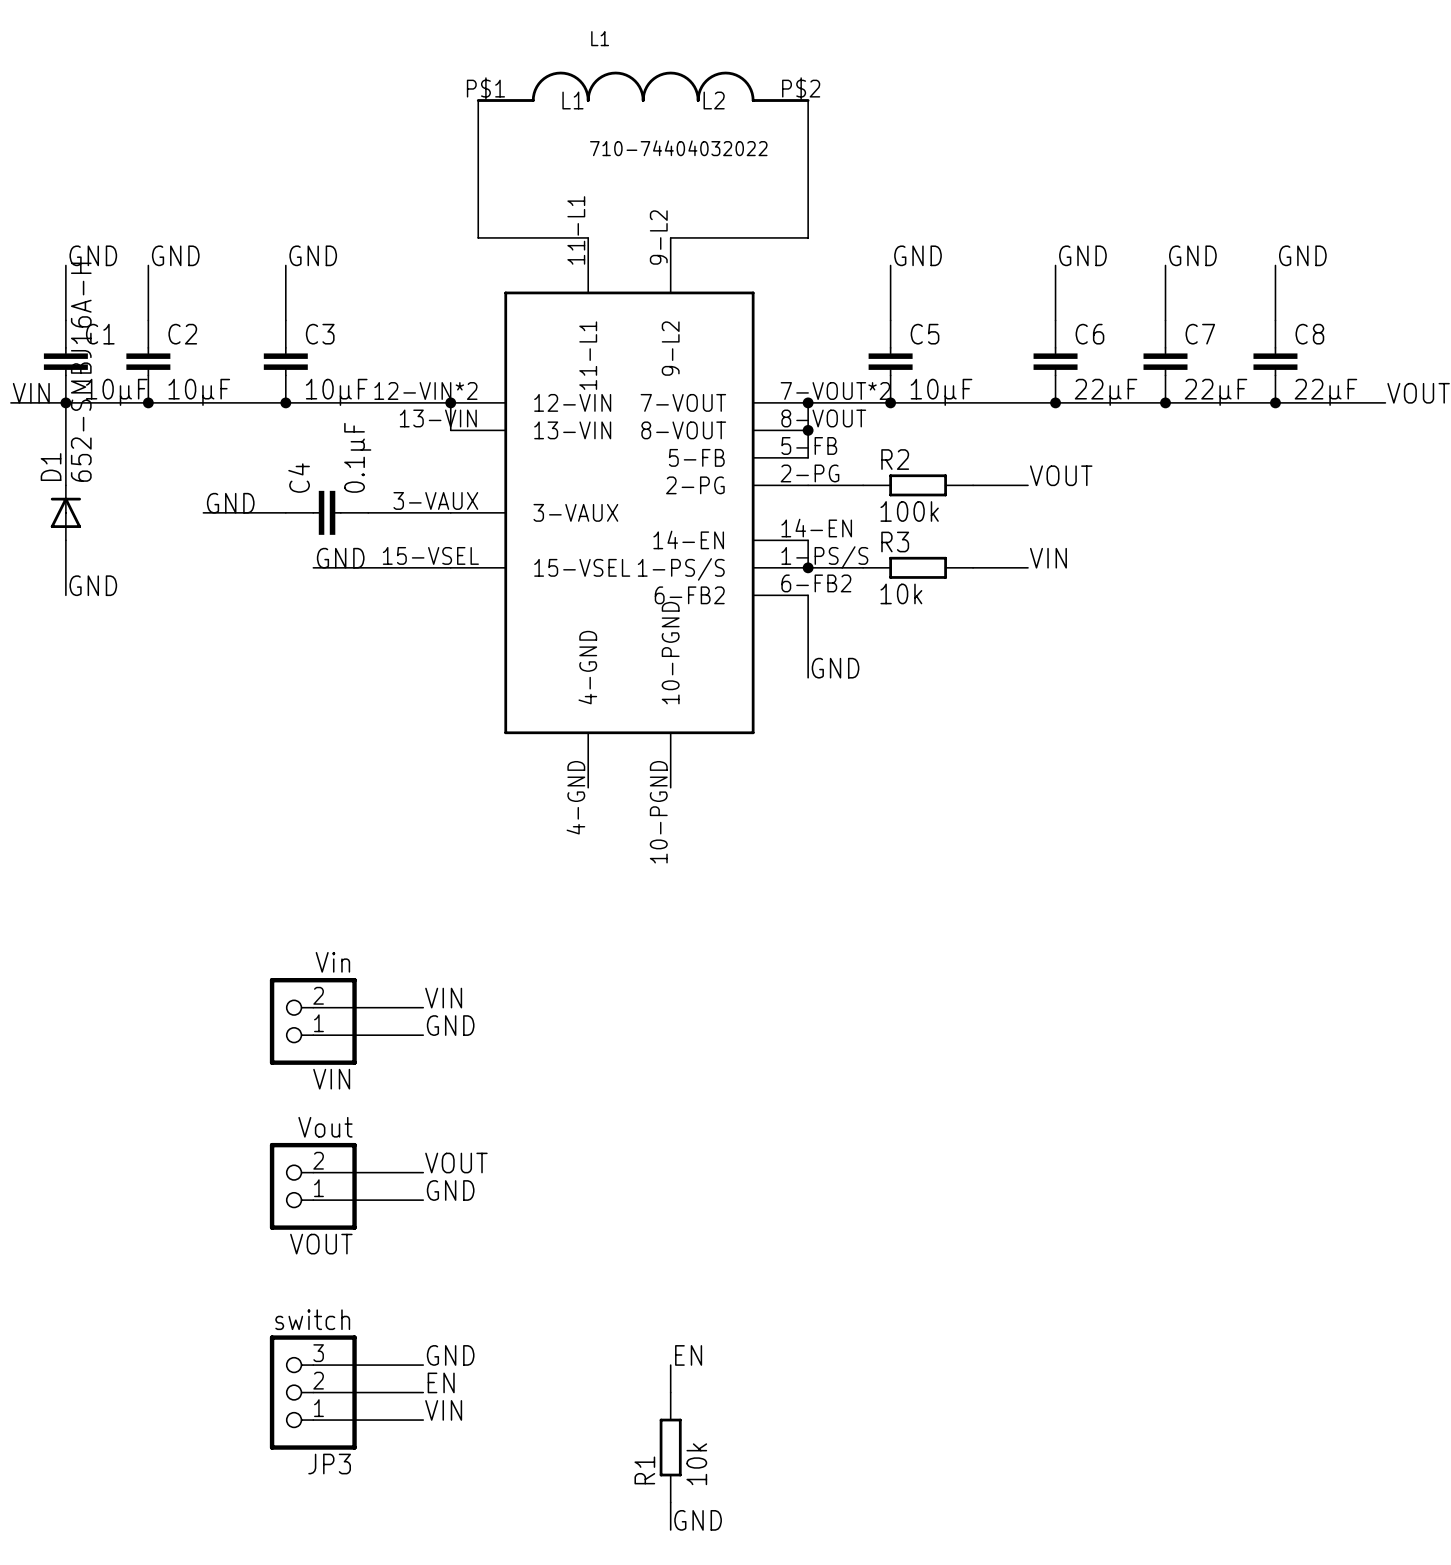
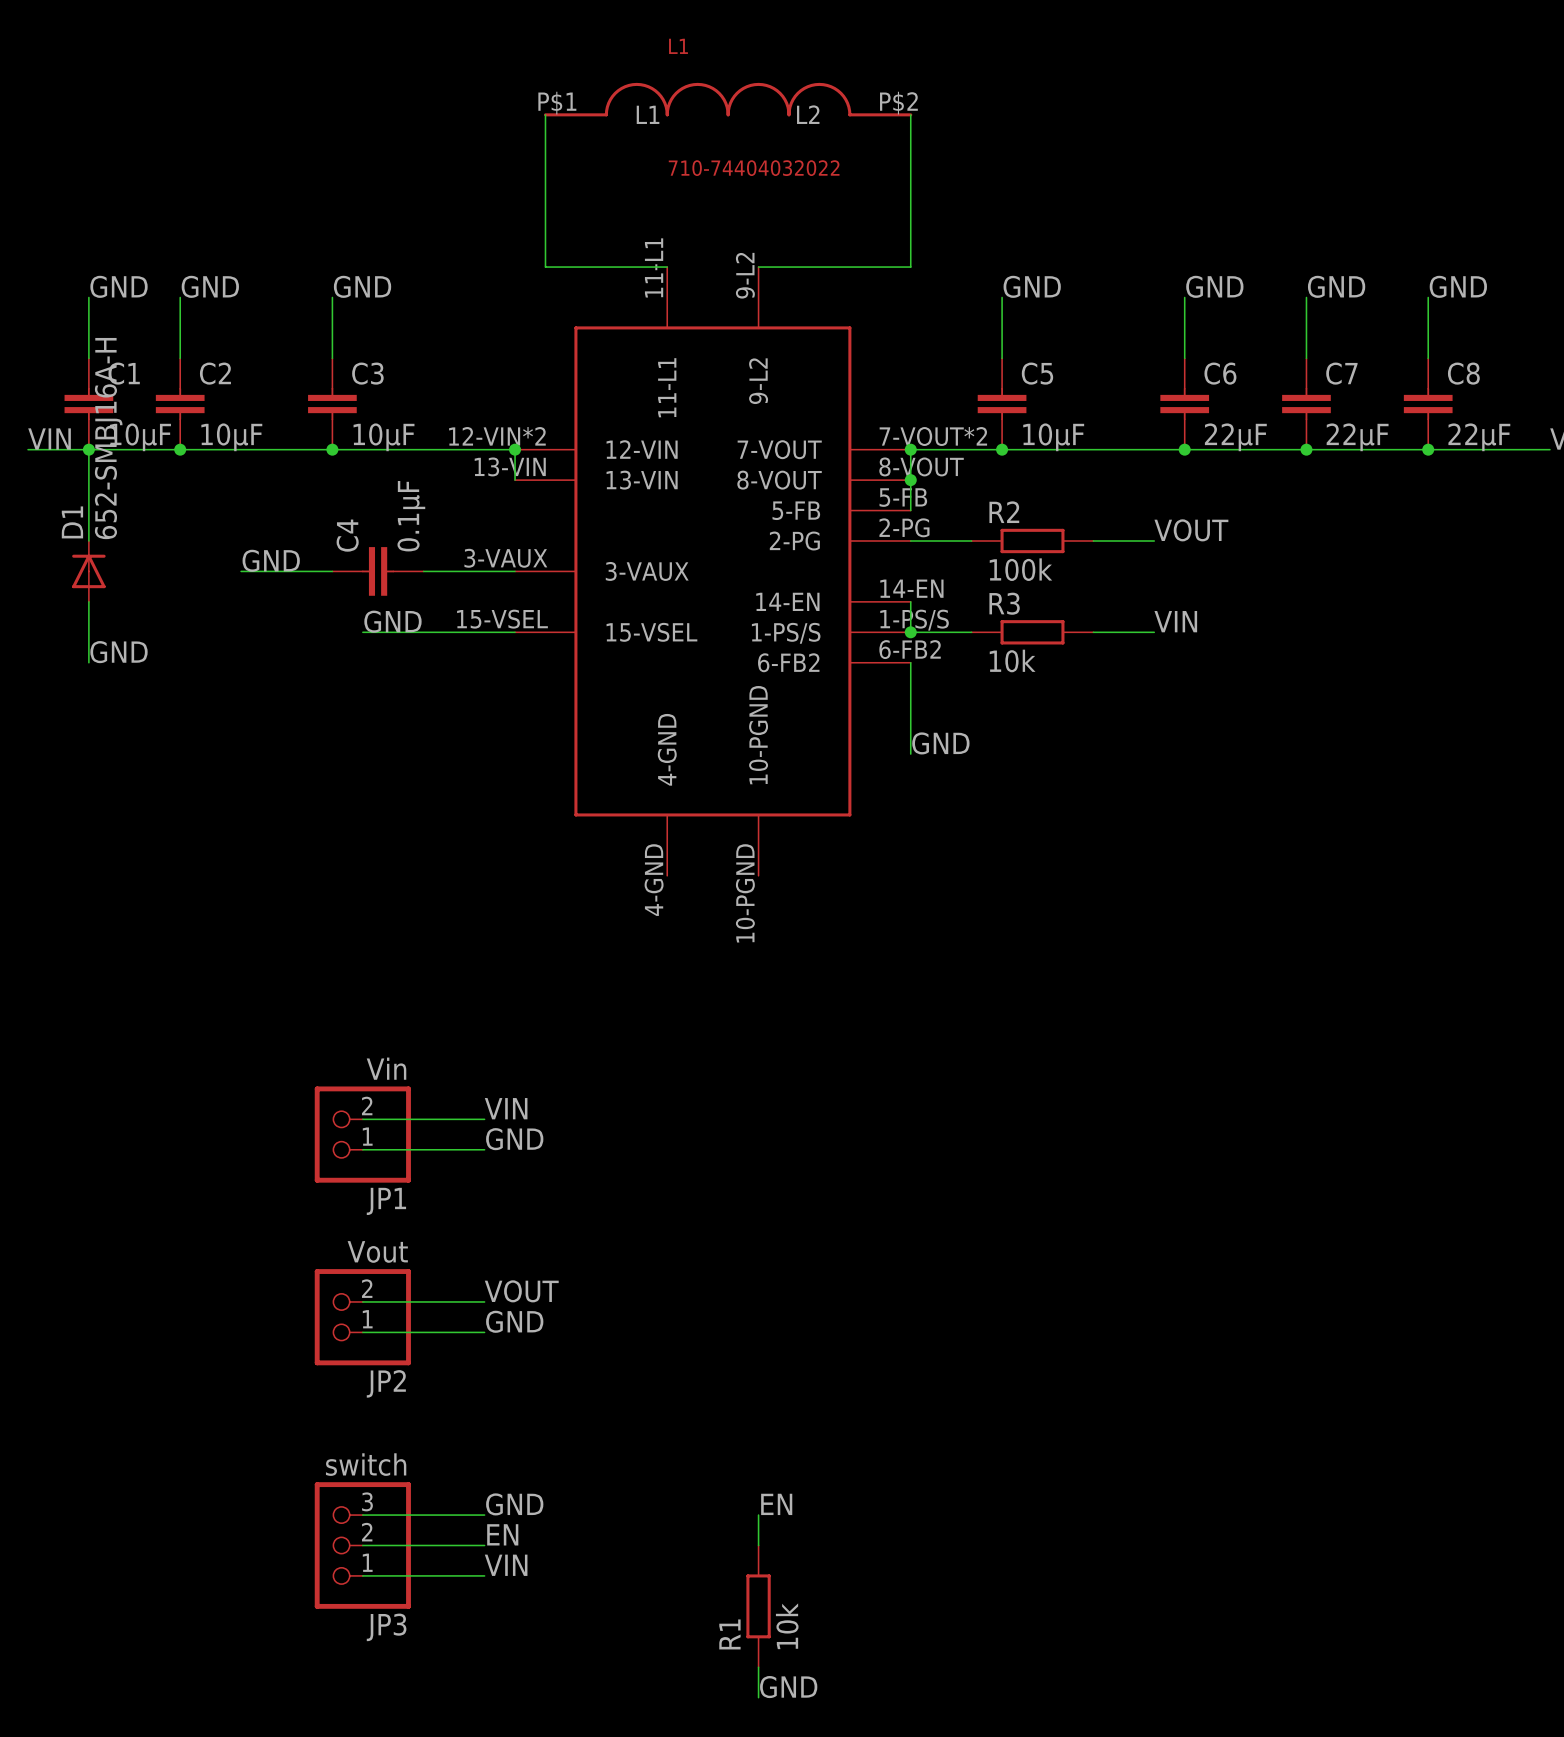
VIN name: VIN (331, 1079) -> JP1 (386, 1201)
VOUT name: VOUT (321, 1244) -> JP2 (386, 1383)

